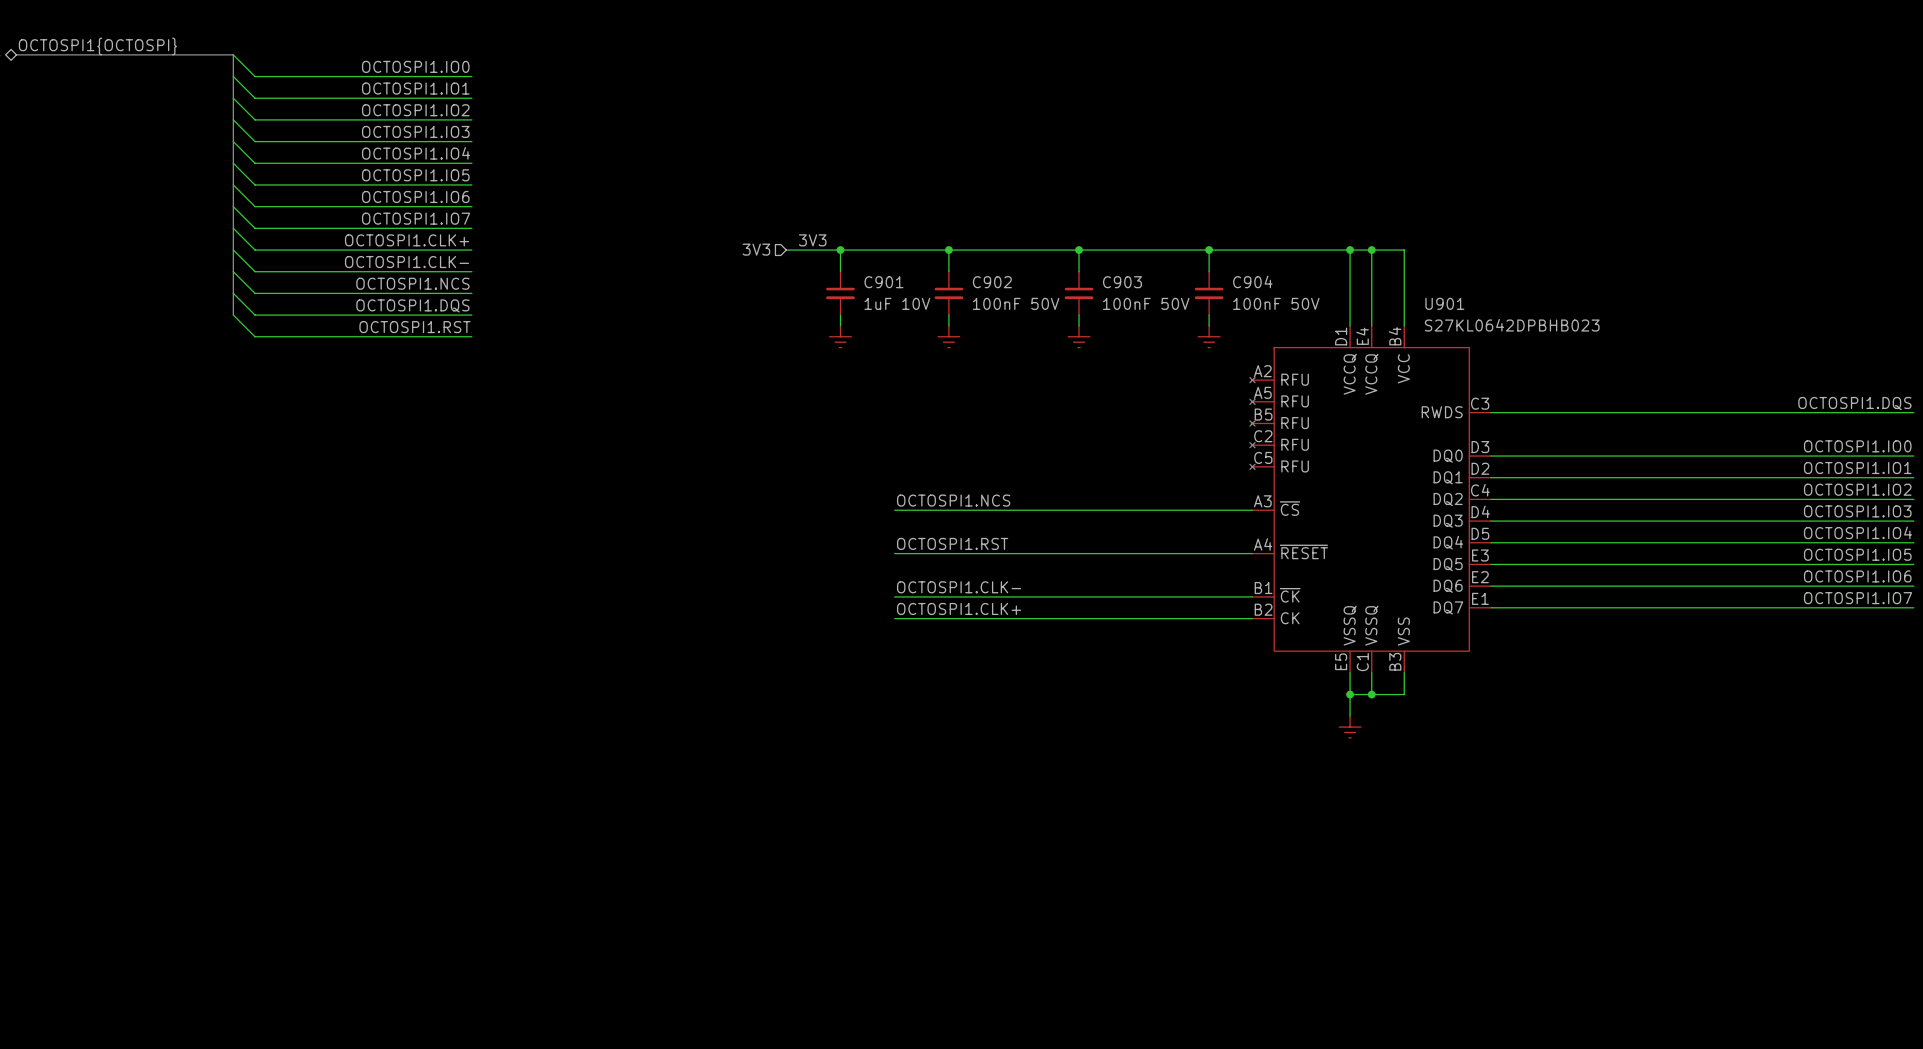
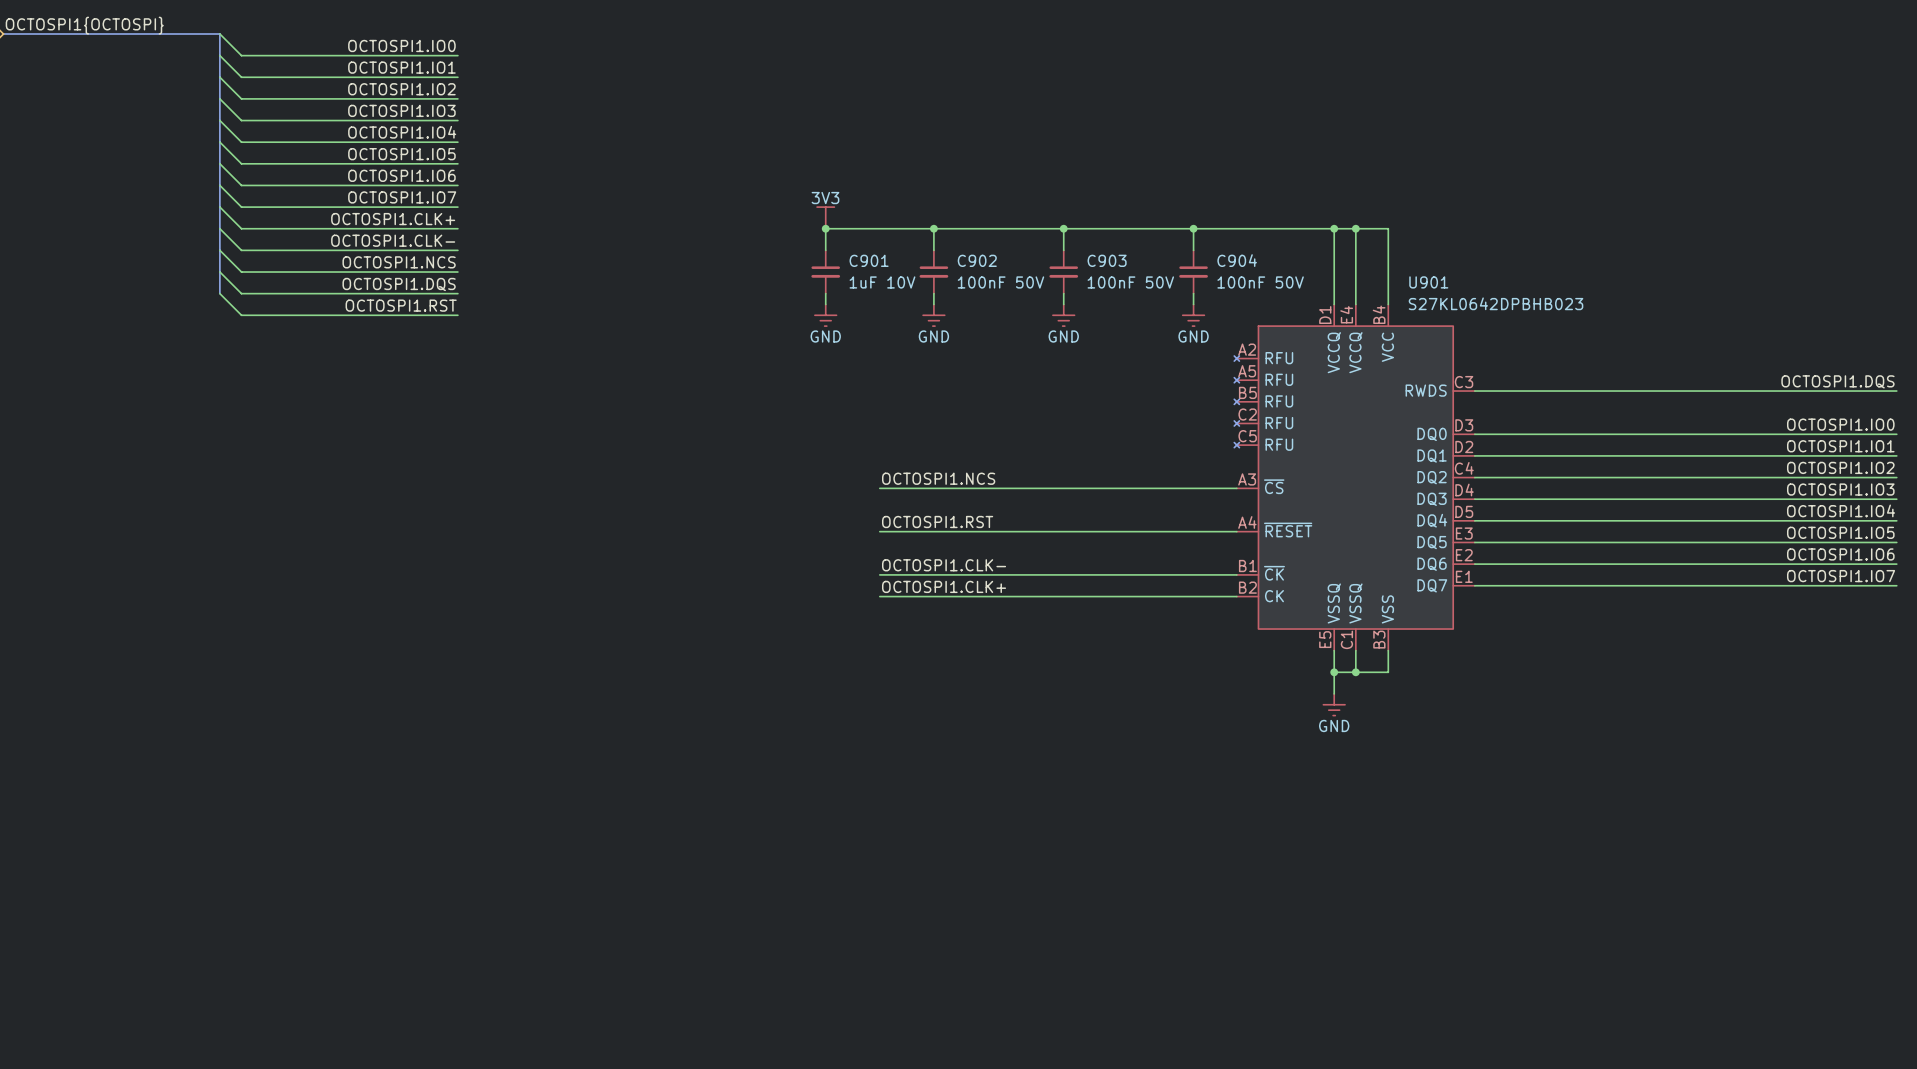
power symbol: none -> 3V3 (825, 217)
label: 3V3 (812, 240) -> none
hierarchical label: 3V3 (756, 249) -> none
wire: (786, 250) (840, 250) -> none
power symbol text: none -> GND (825, 336)
power symbol text: none -> GND (933, 336)
power symbol text: none -> GND (1063, 336)
power symbol text: none -> GND (1193, 336)
power symbol text: none -> GND (1334, 725)

